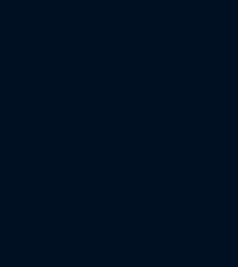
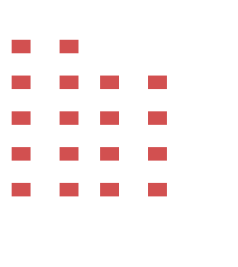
part: none -> (45, 46)
part: none -> (45, 82)
part: none -> (133, 82)
part: none -> (45, 118)
part: none -> (133, 118)
part: none -> (45, 153)
part: none -> (133, 153)
part: none -> (45, 189)
part: none -> (133, 189)

